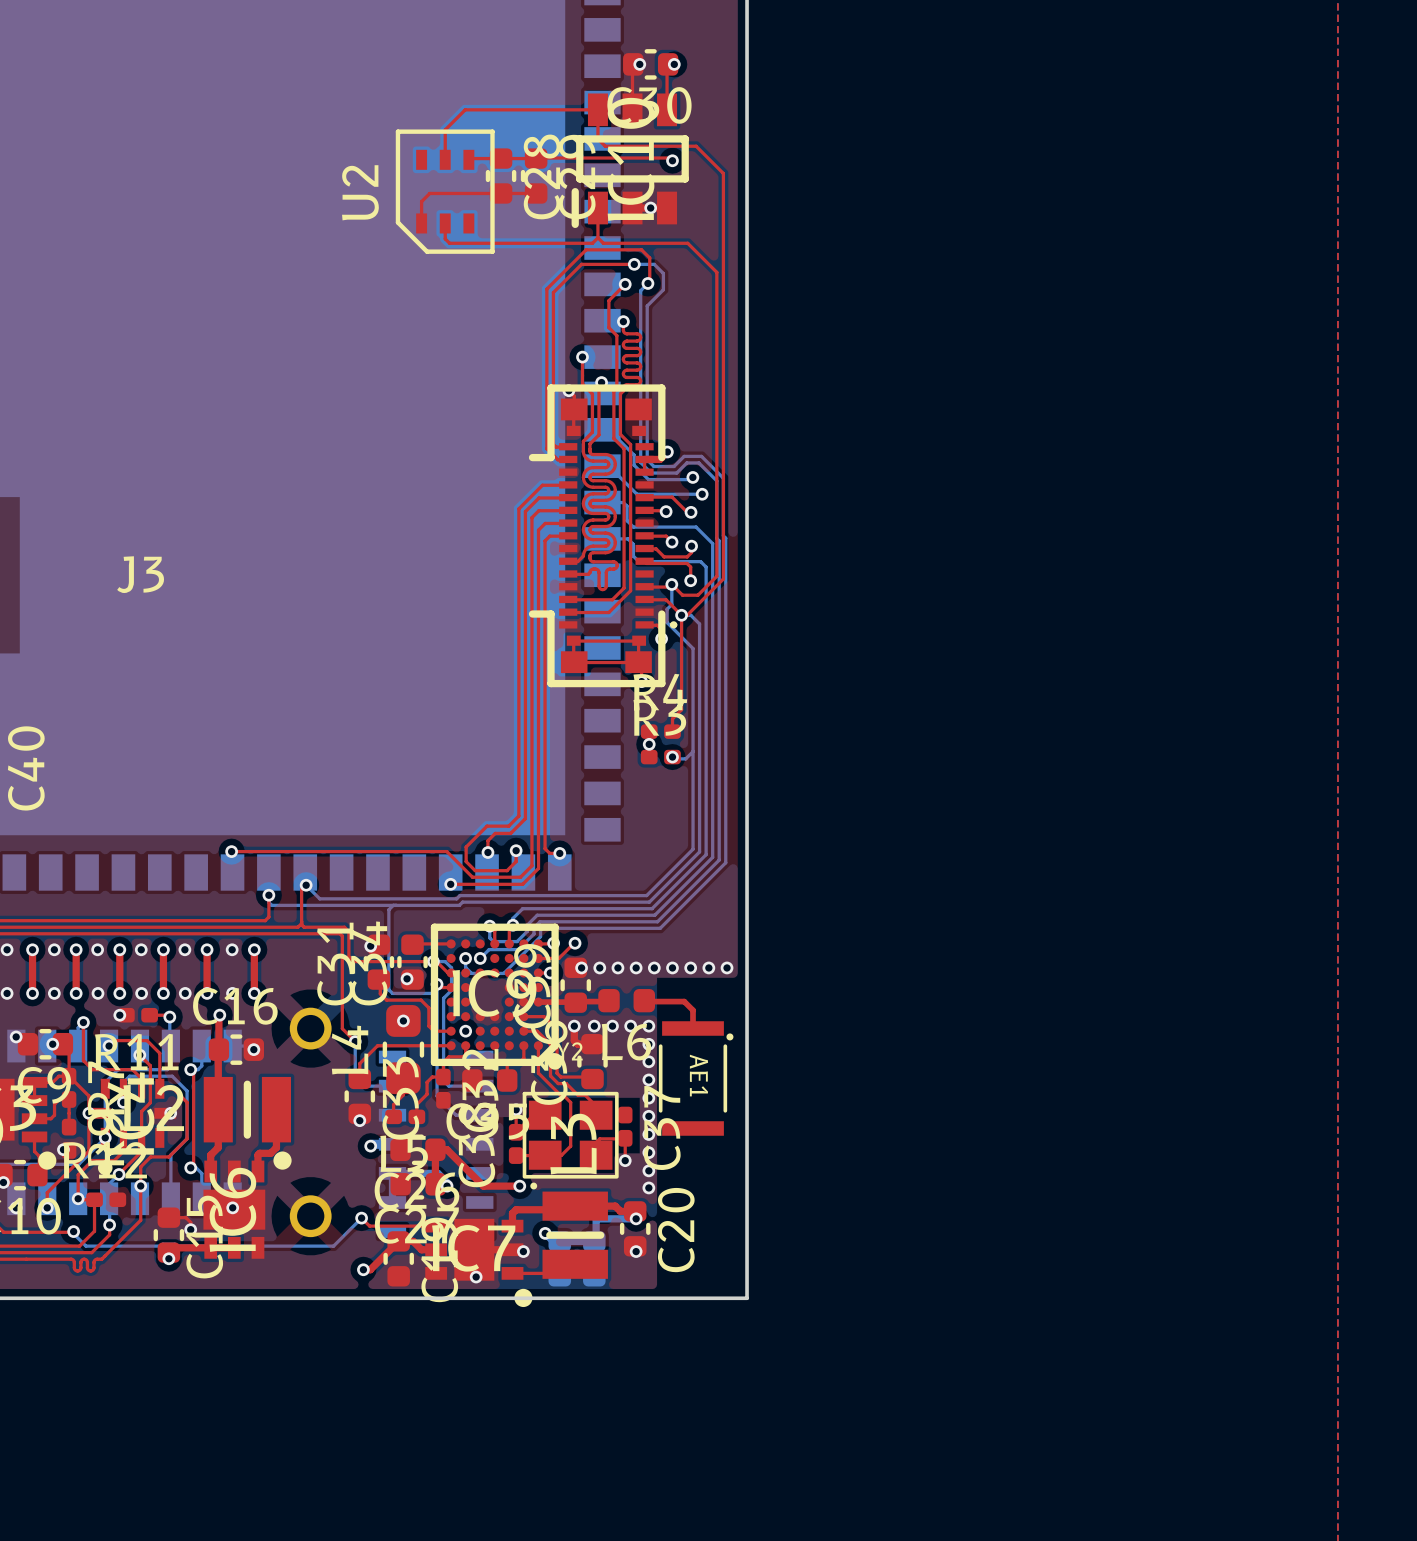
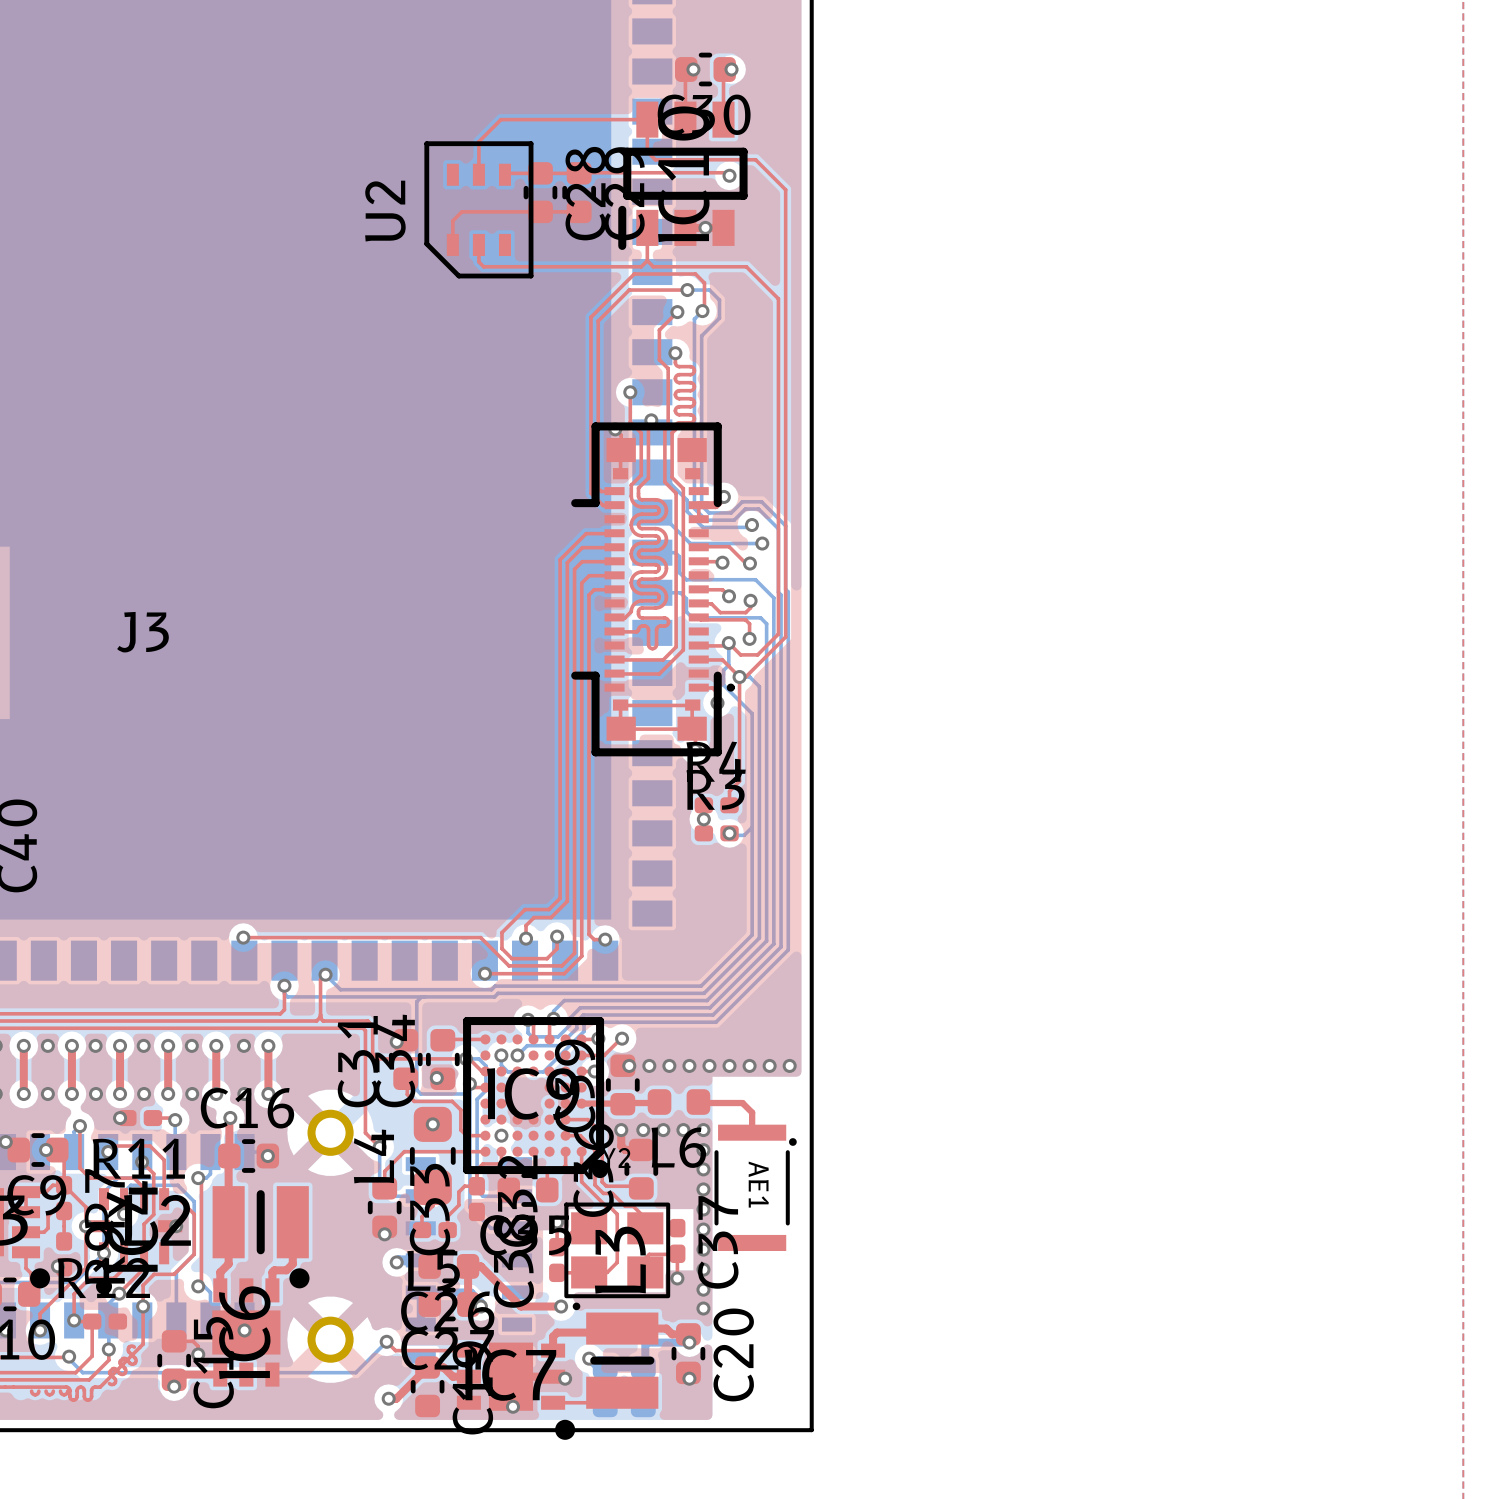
top track: none -> (134, 1347) (130, 1346) (128, 1350) (135, 1358) (135, 1362) (131, 1364) (122, 1358) (119, 1362) (125, 1368) (125, 1372) (121, 1374) (112, 1368) (109, 1373) (115, 1381) (112, 1384) (109, 1383)
top track: none -> (31, 1391) (35, 1394) (38, 1391)
top track: none -> (46, 1391) (49, 1394) (53, 1391)
top track: none -> (60, 1391) (64, 1394) (67, 1391)

